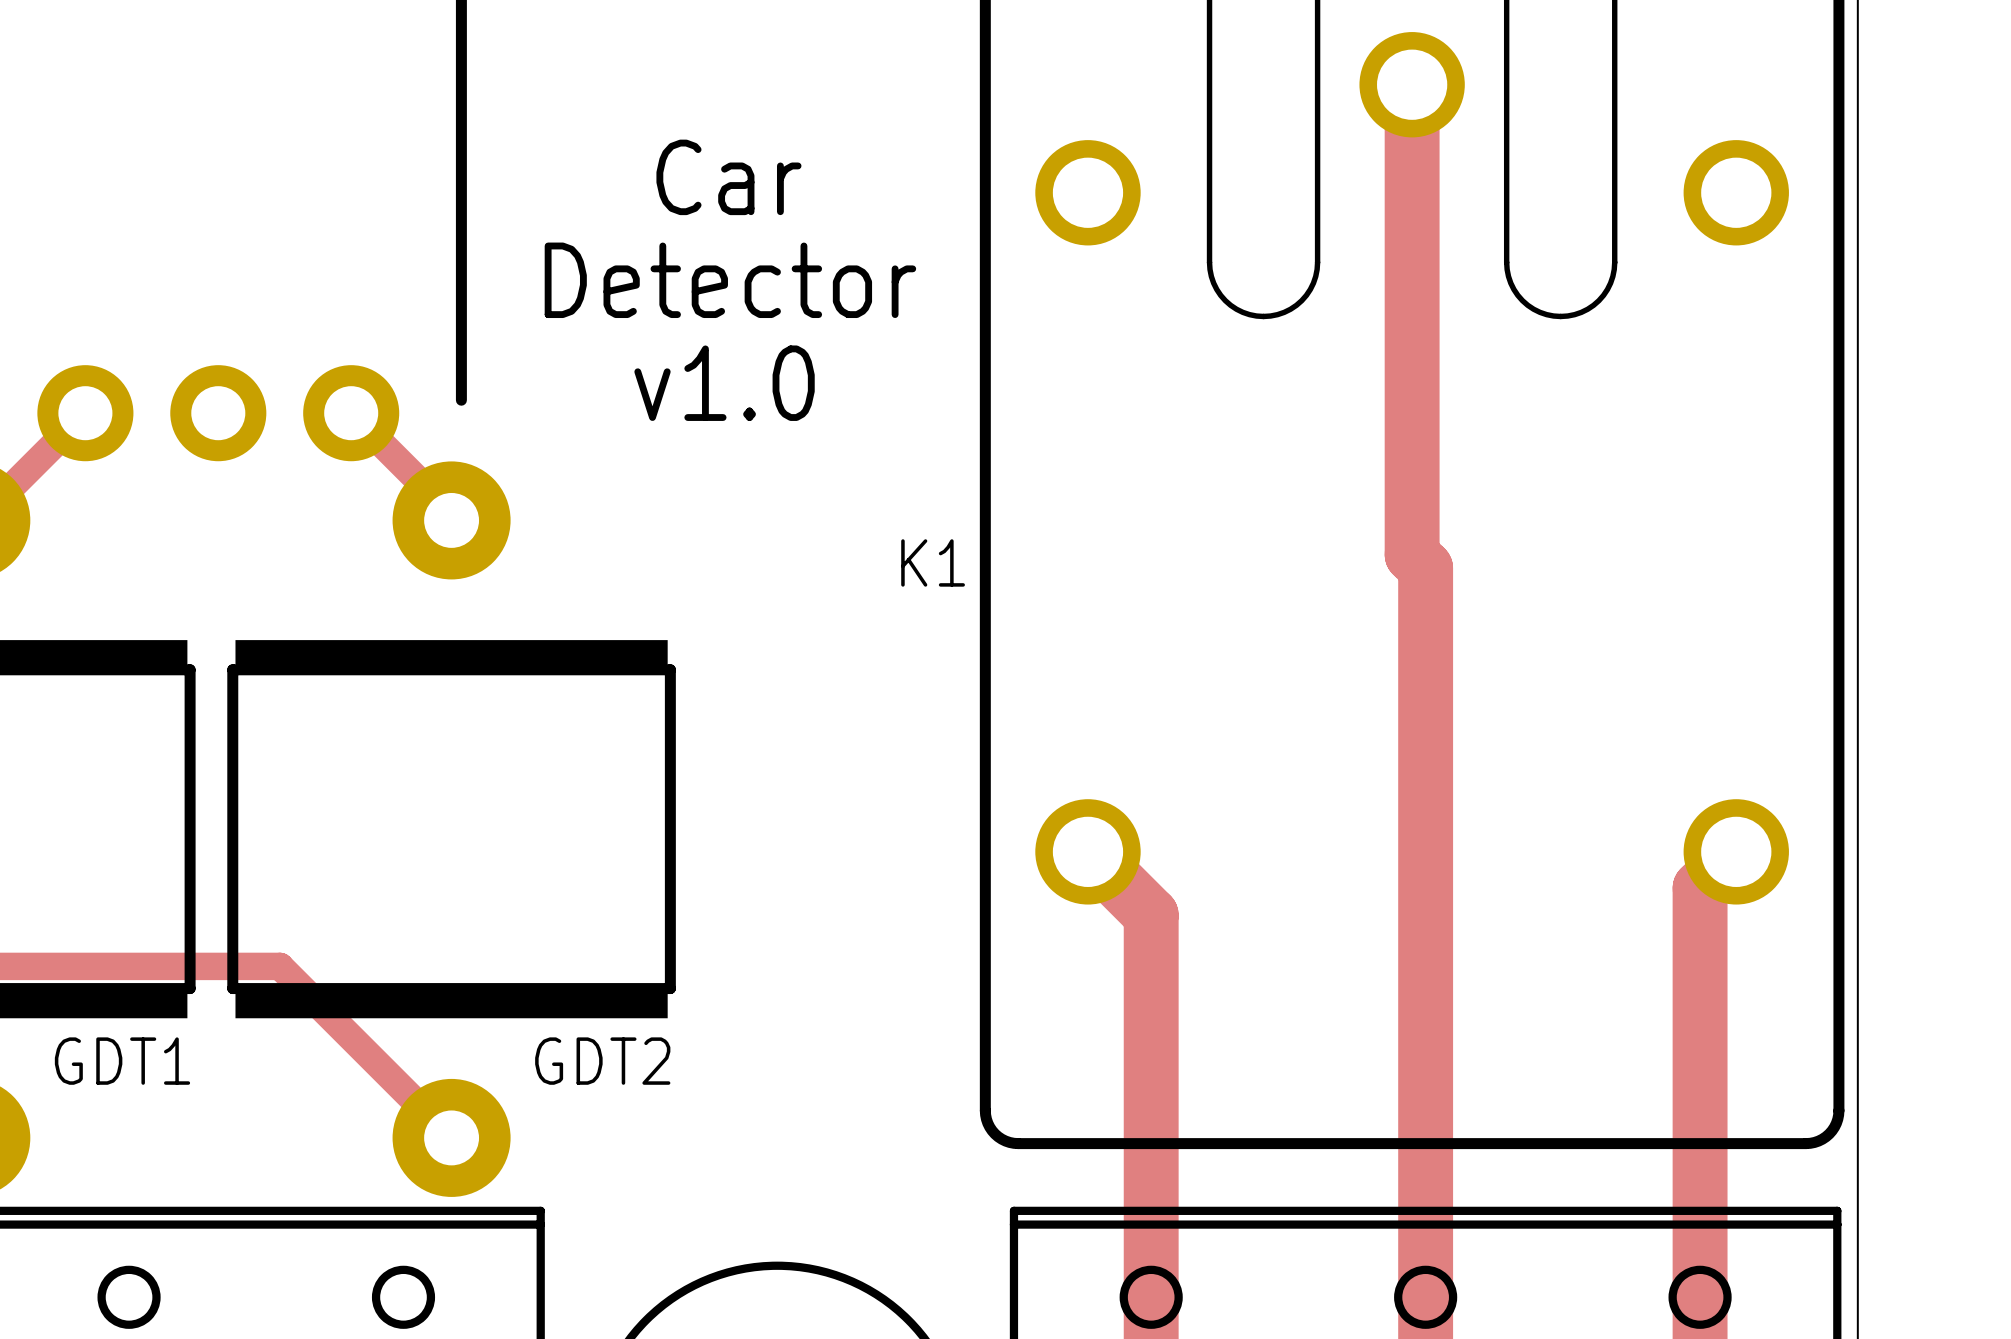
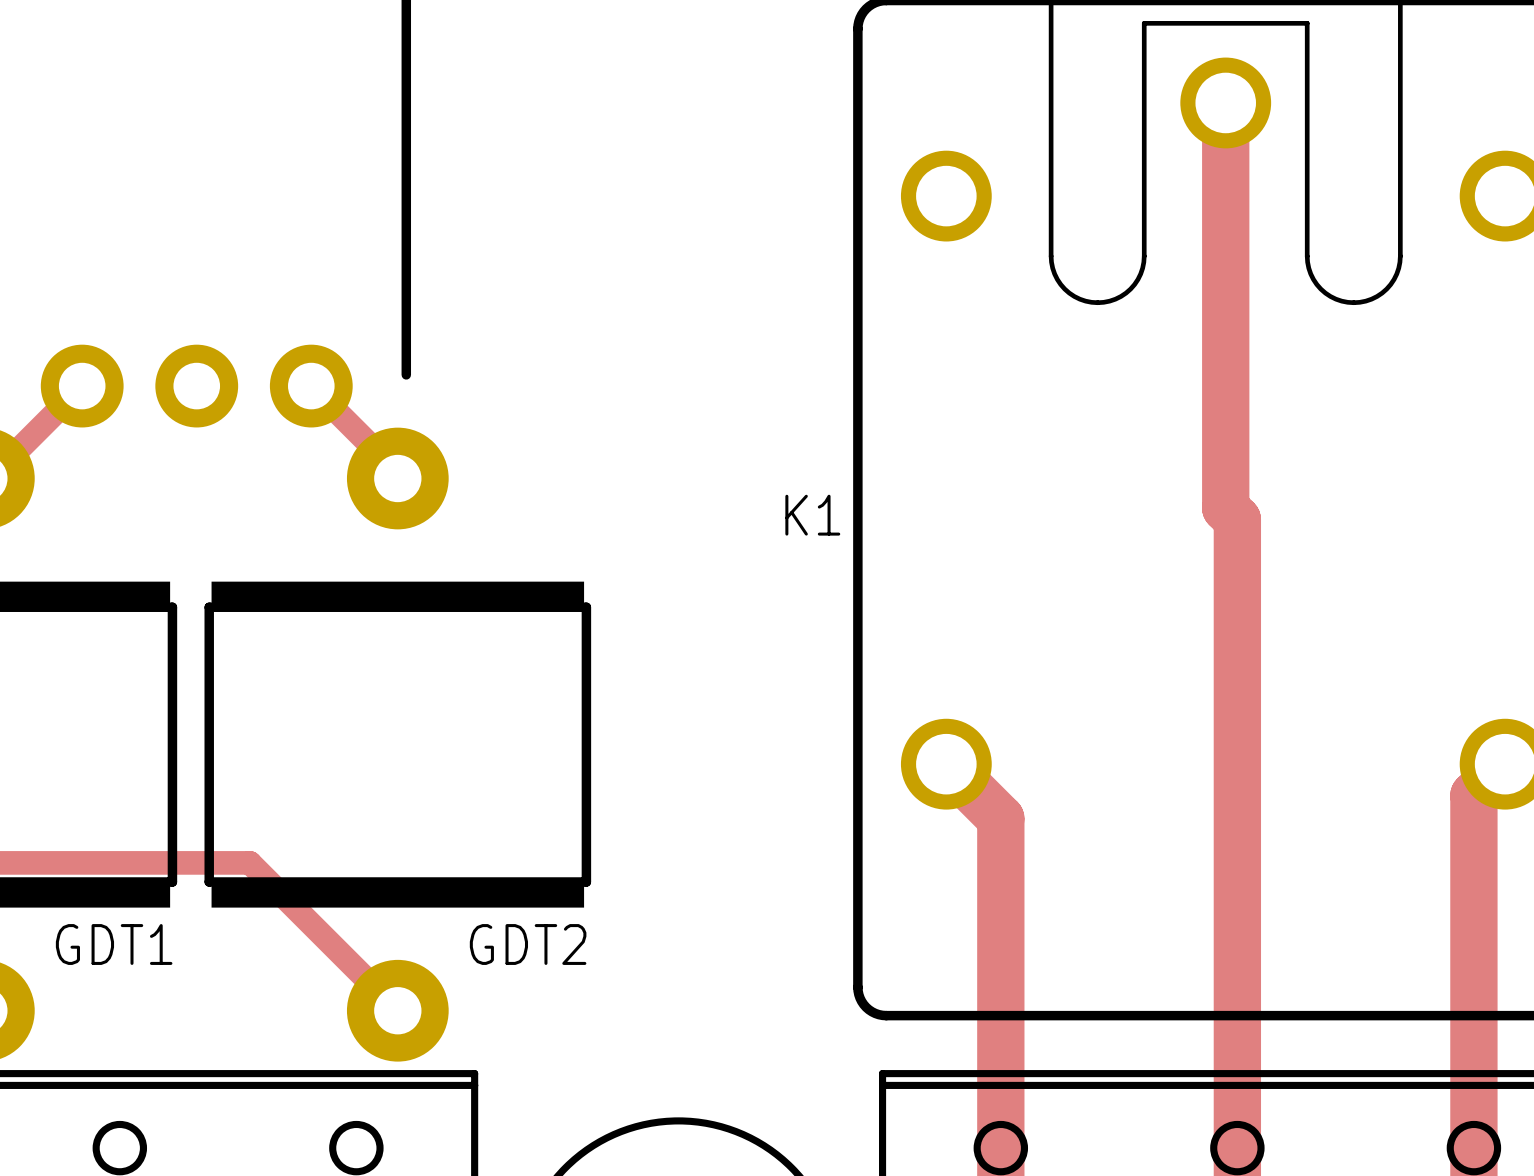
text: Car (728, 177) -> none
text: Detector (730, 280) -> none
text: v1.0 (724, 383) -> none

